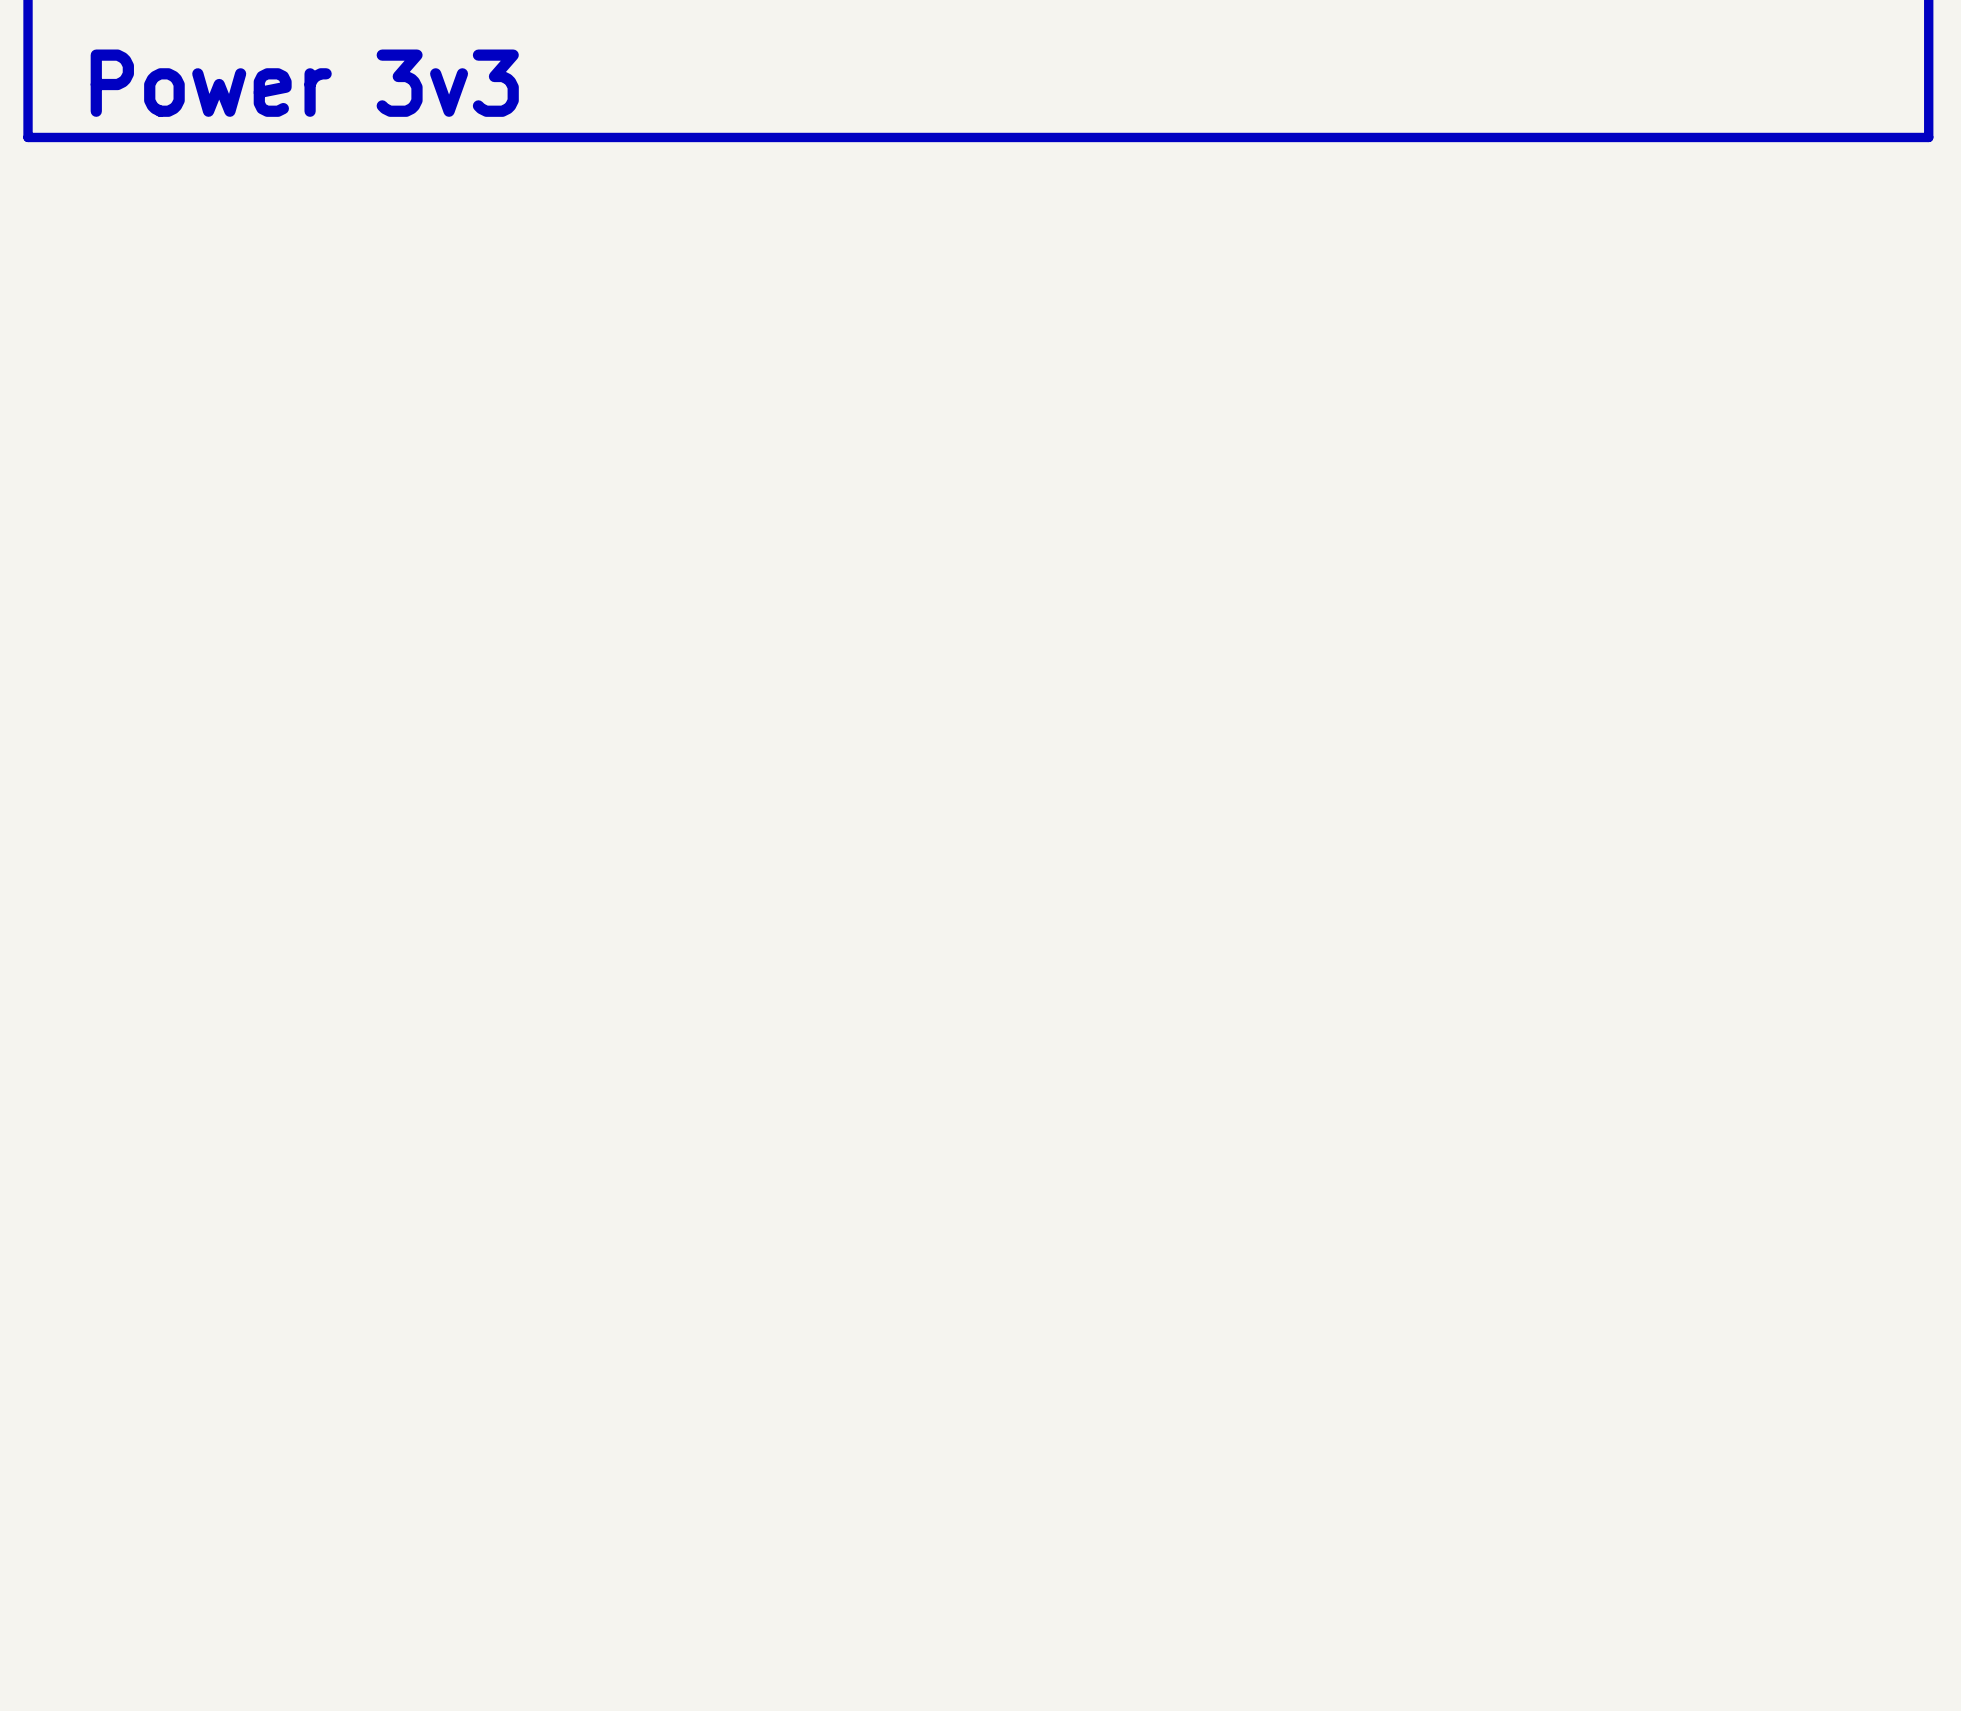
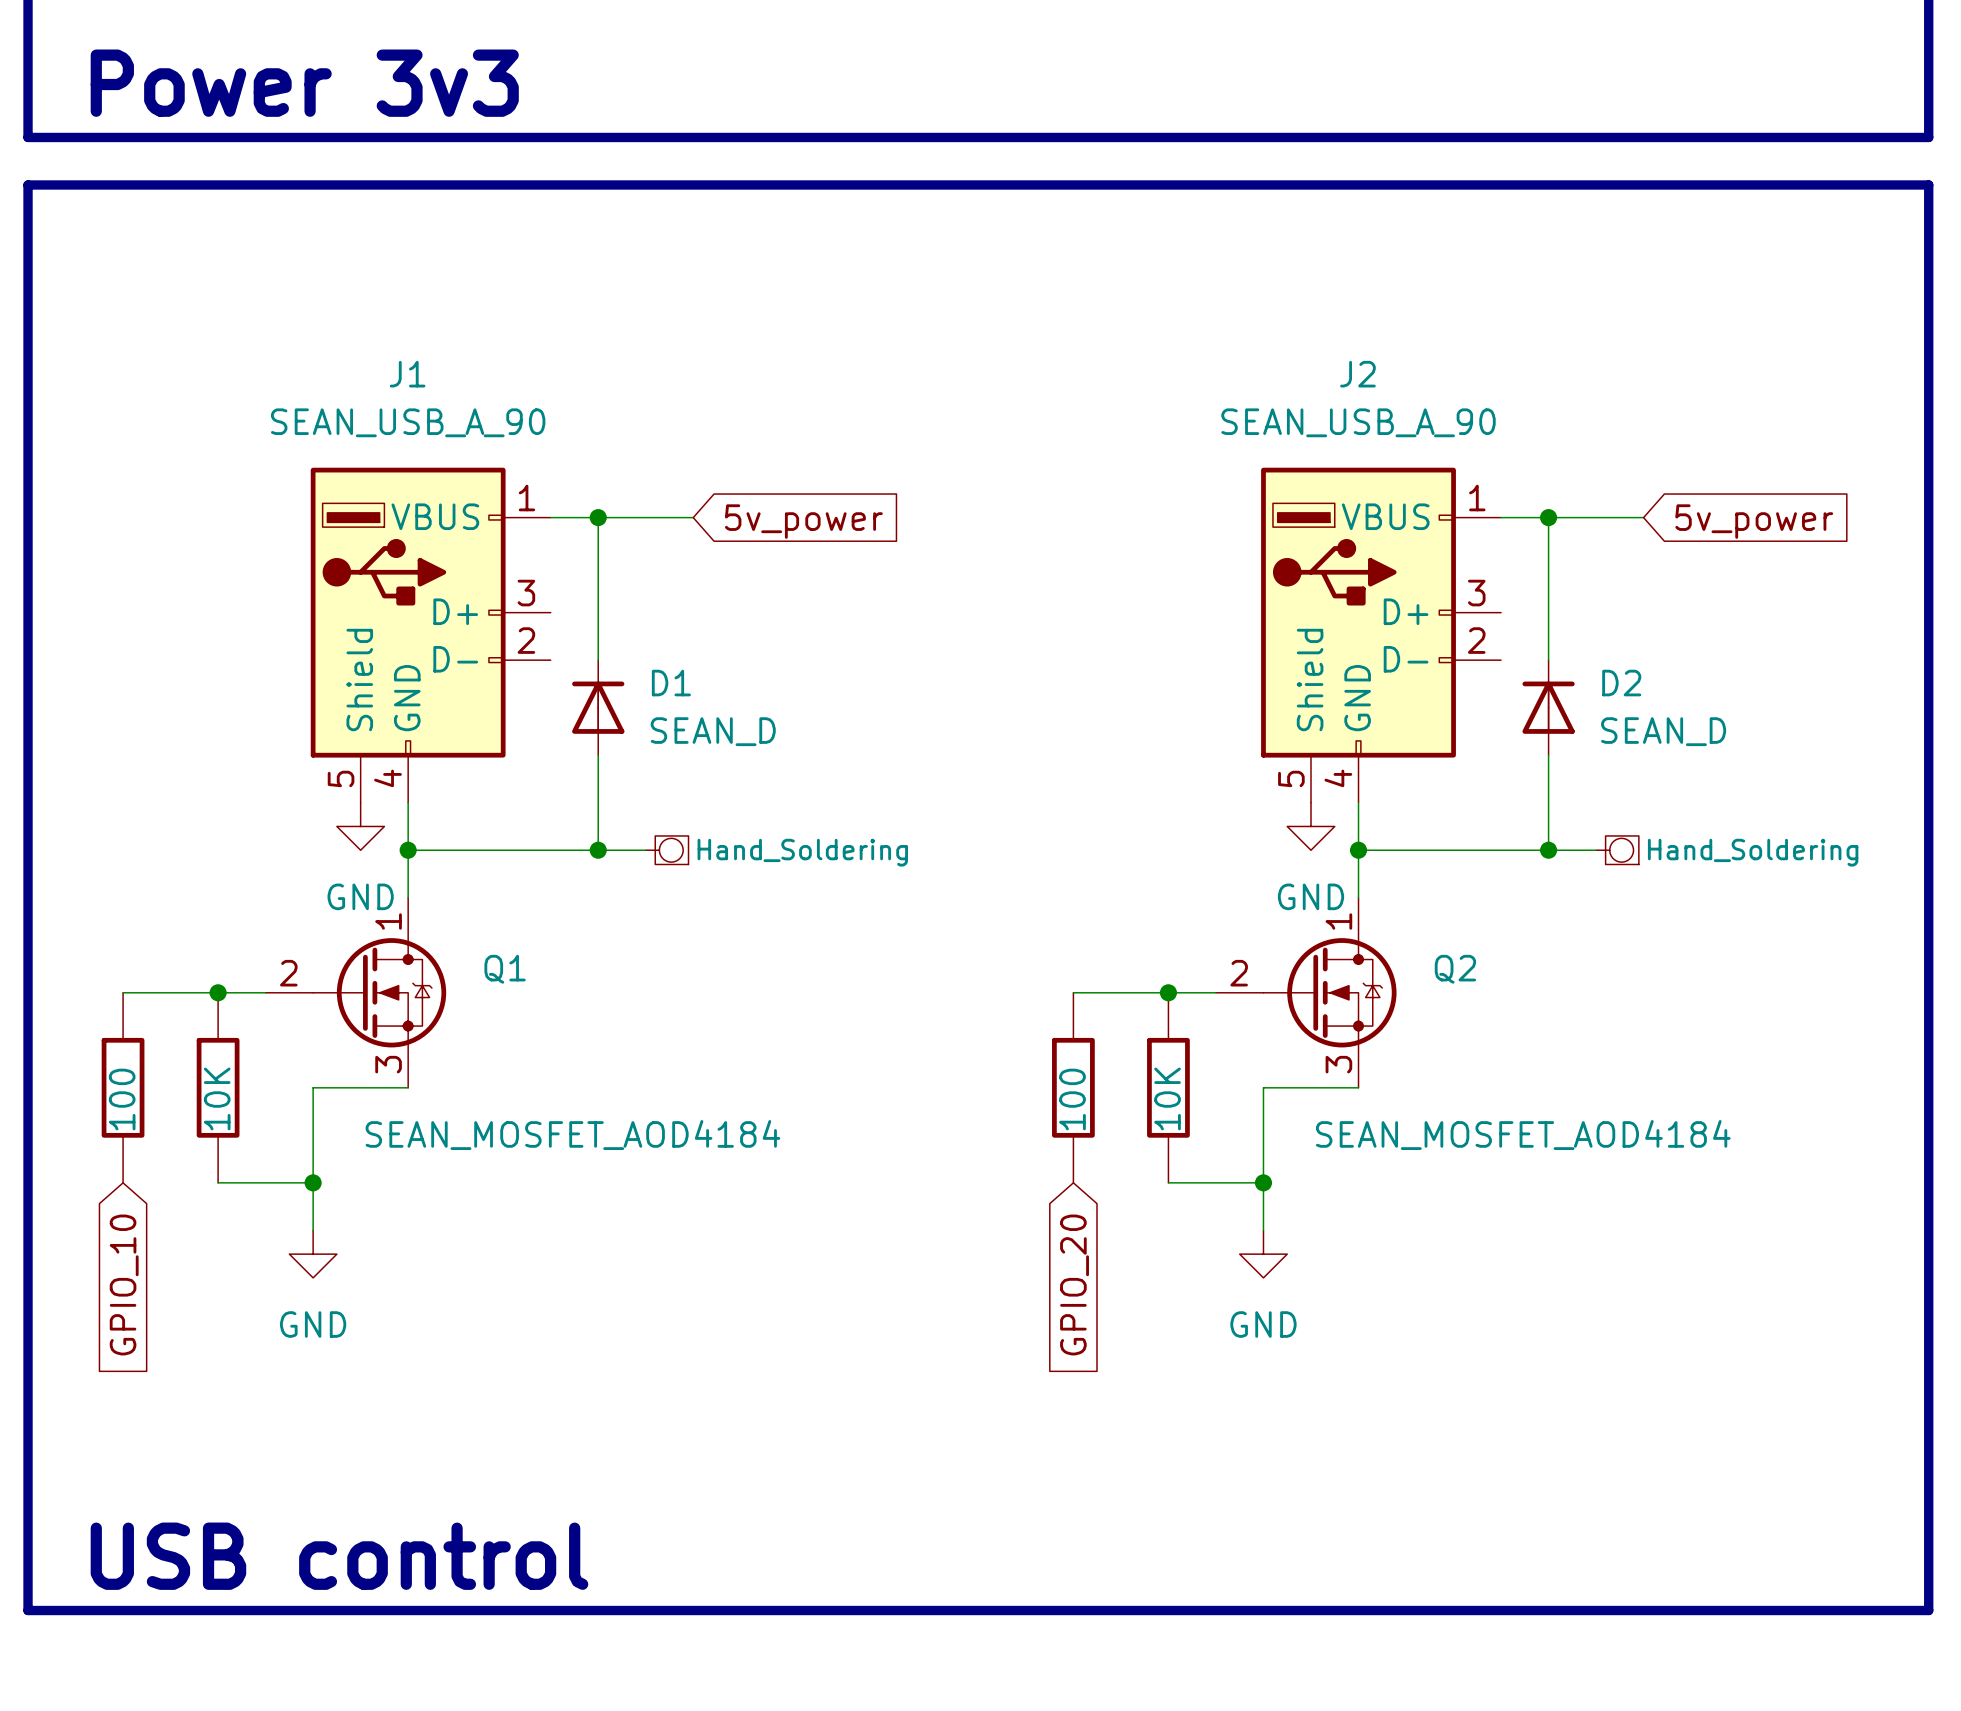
line: none -> (28, 184) (1928, 184) (1928, 1610) (28, 1610) (28, 184)
wire: none -> (550, 517) (693, 517)
wire: none -> (598, 517) (598, 660)
junction: none -> (598, 517)
wire: none -> (1501, 517) (1643, 517)
wire: none -> (1548, 517) (1548, 660)
junction: none -> (1548, 517)
global label: none -> 5v_power (803, 521)
global label: none -> 5v_power (1754, 521)
J1: none -> SEAN_USB_A_90 (430, 635)
J2: none -> SEAN_USB_A_90 (1381, 635)
D1: none -> SEAN_D (598, 707)
D2: none -> SEAN_D (1548, 707)
wire: none -> (598, 755) (598, 850)
wire: none -> (1548, 755) (1548, 850)
wire: none -> (408, 802) (408, 897)
wire: none -> (1358, 802) (1358, 897)
power symbol: none -> GND (360, 826)
power symbol: none -> GND (1310, 826)
wire: none -> (408, 850) (645, 850)
junction: none -> (408, 850)
junction: none -> (598, 850)
part: none -> (667, 850)
wire: none -> (1358, 850) (1596, 850)
junction: none -> (1358, 850)
junction: none -> (1548, 850)
part: none -> (1617, 850)
wire: none -> (123, 992) (265, 992)
junction: none -> (218, 992)
Q1: none -> SEAN_MOSFET_AOD4184 (355, 992)
wire: none -> (1073, 992) (1215, 992)
junction: none -> (1168, 992)
Q2: none -> SEAN_MOSFET_AOD4184 (1306, 992)
part: none -> 100 (123, 1087)
part: none -> 10K (218, 1087)
wire: none -> (408, 1087) (313, 1087) (313, 1230)
part: none -> 100 (1073, 1087)
part: none -> 10K (1168, 1087)
wire: none -> (1358, 1087) (1263, 1087) (1263, 1230)
wire: none -> (218, 1182) (313, 1182)
junction: none -> (313, 1182)
wire: none -> (1168, 1182) (1263, 1182)
junction: none -> (1263, 1182)
power symbol: none -> GND (313, 1254)
power symbol: none -> GND (1263, 1254)
global label: none -> GPIO_10 (124, 1285)
global label: none -> GPIO_20 (1074, 1285)
text: none -> USB control (339, 1556)

